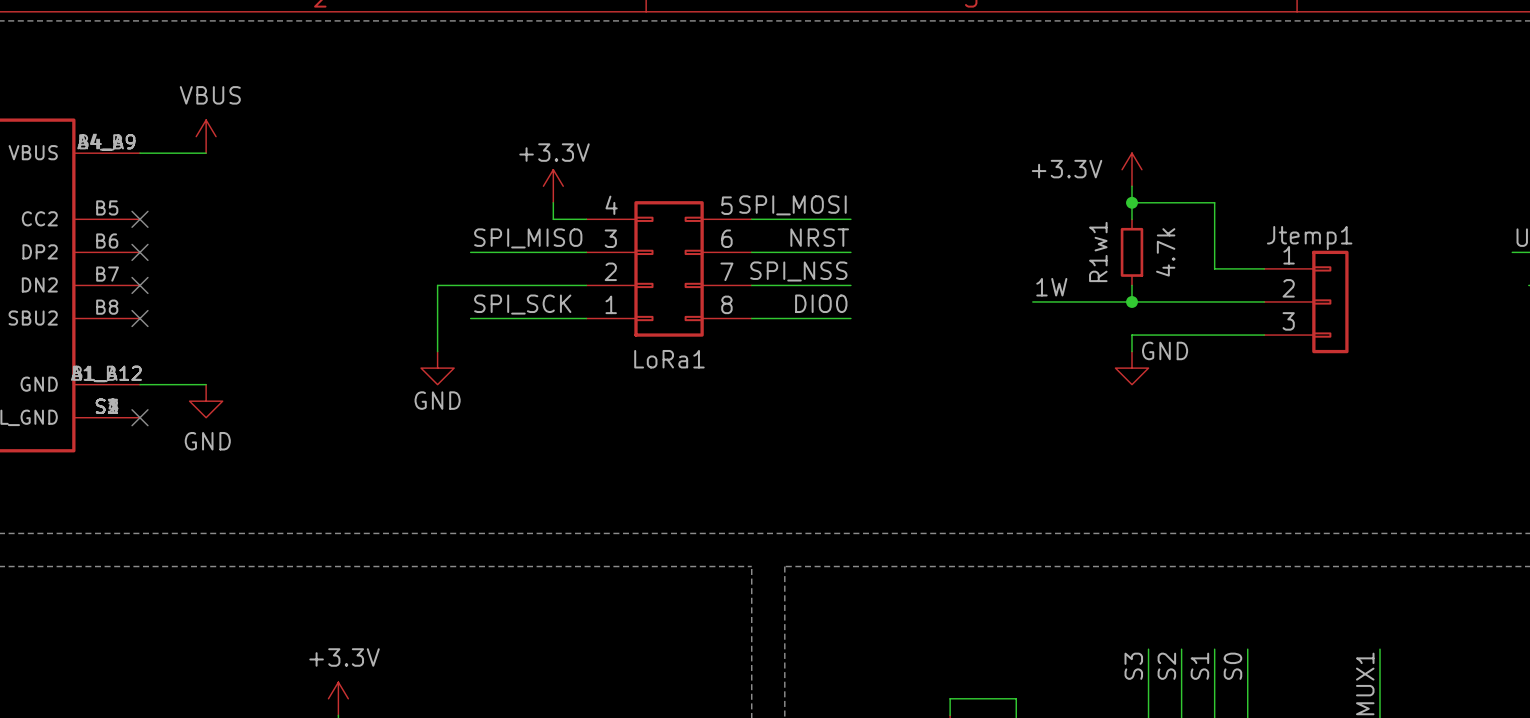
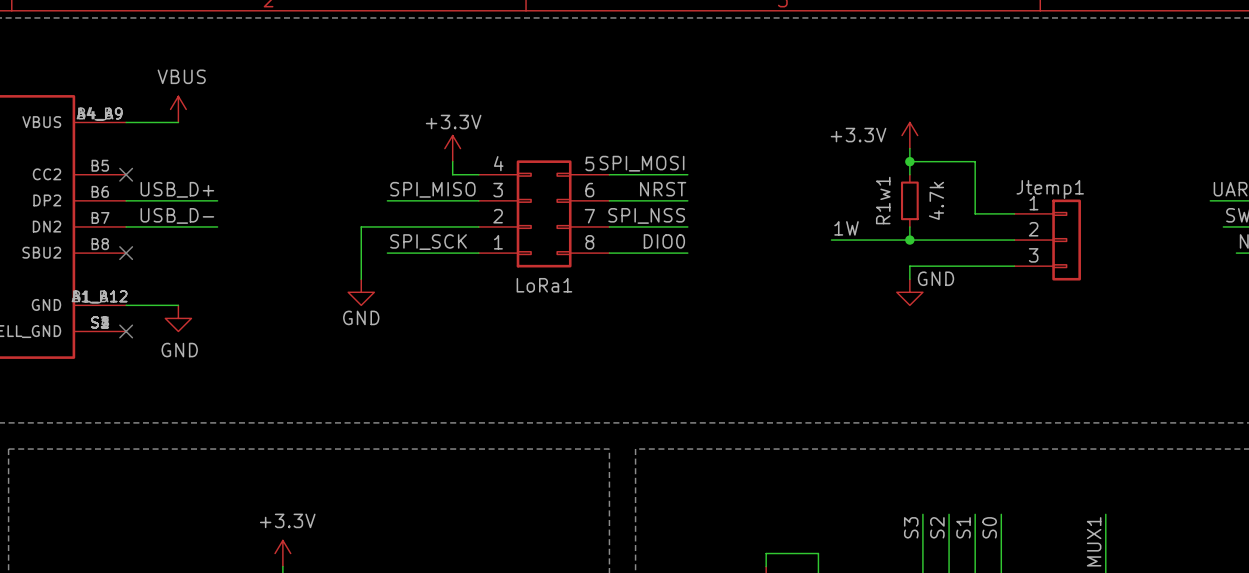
label: none -> USB_D+ (177, 189)
wire: none -> (126, 200) (217, 200)
no-connect mark: (139, 252) -> none
label: none -> USB_D- (177, 215)
wire: none -> (126, 226) (217, 226)
no-connect mark: (139, 285) -> none

